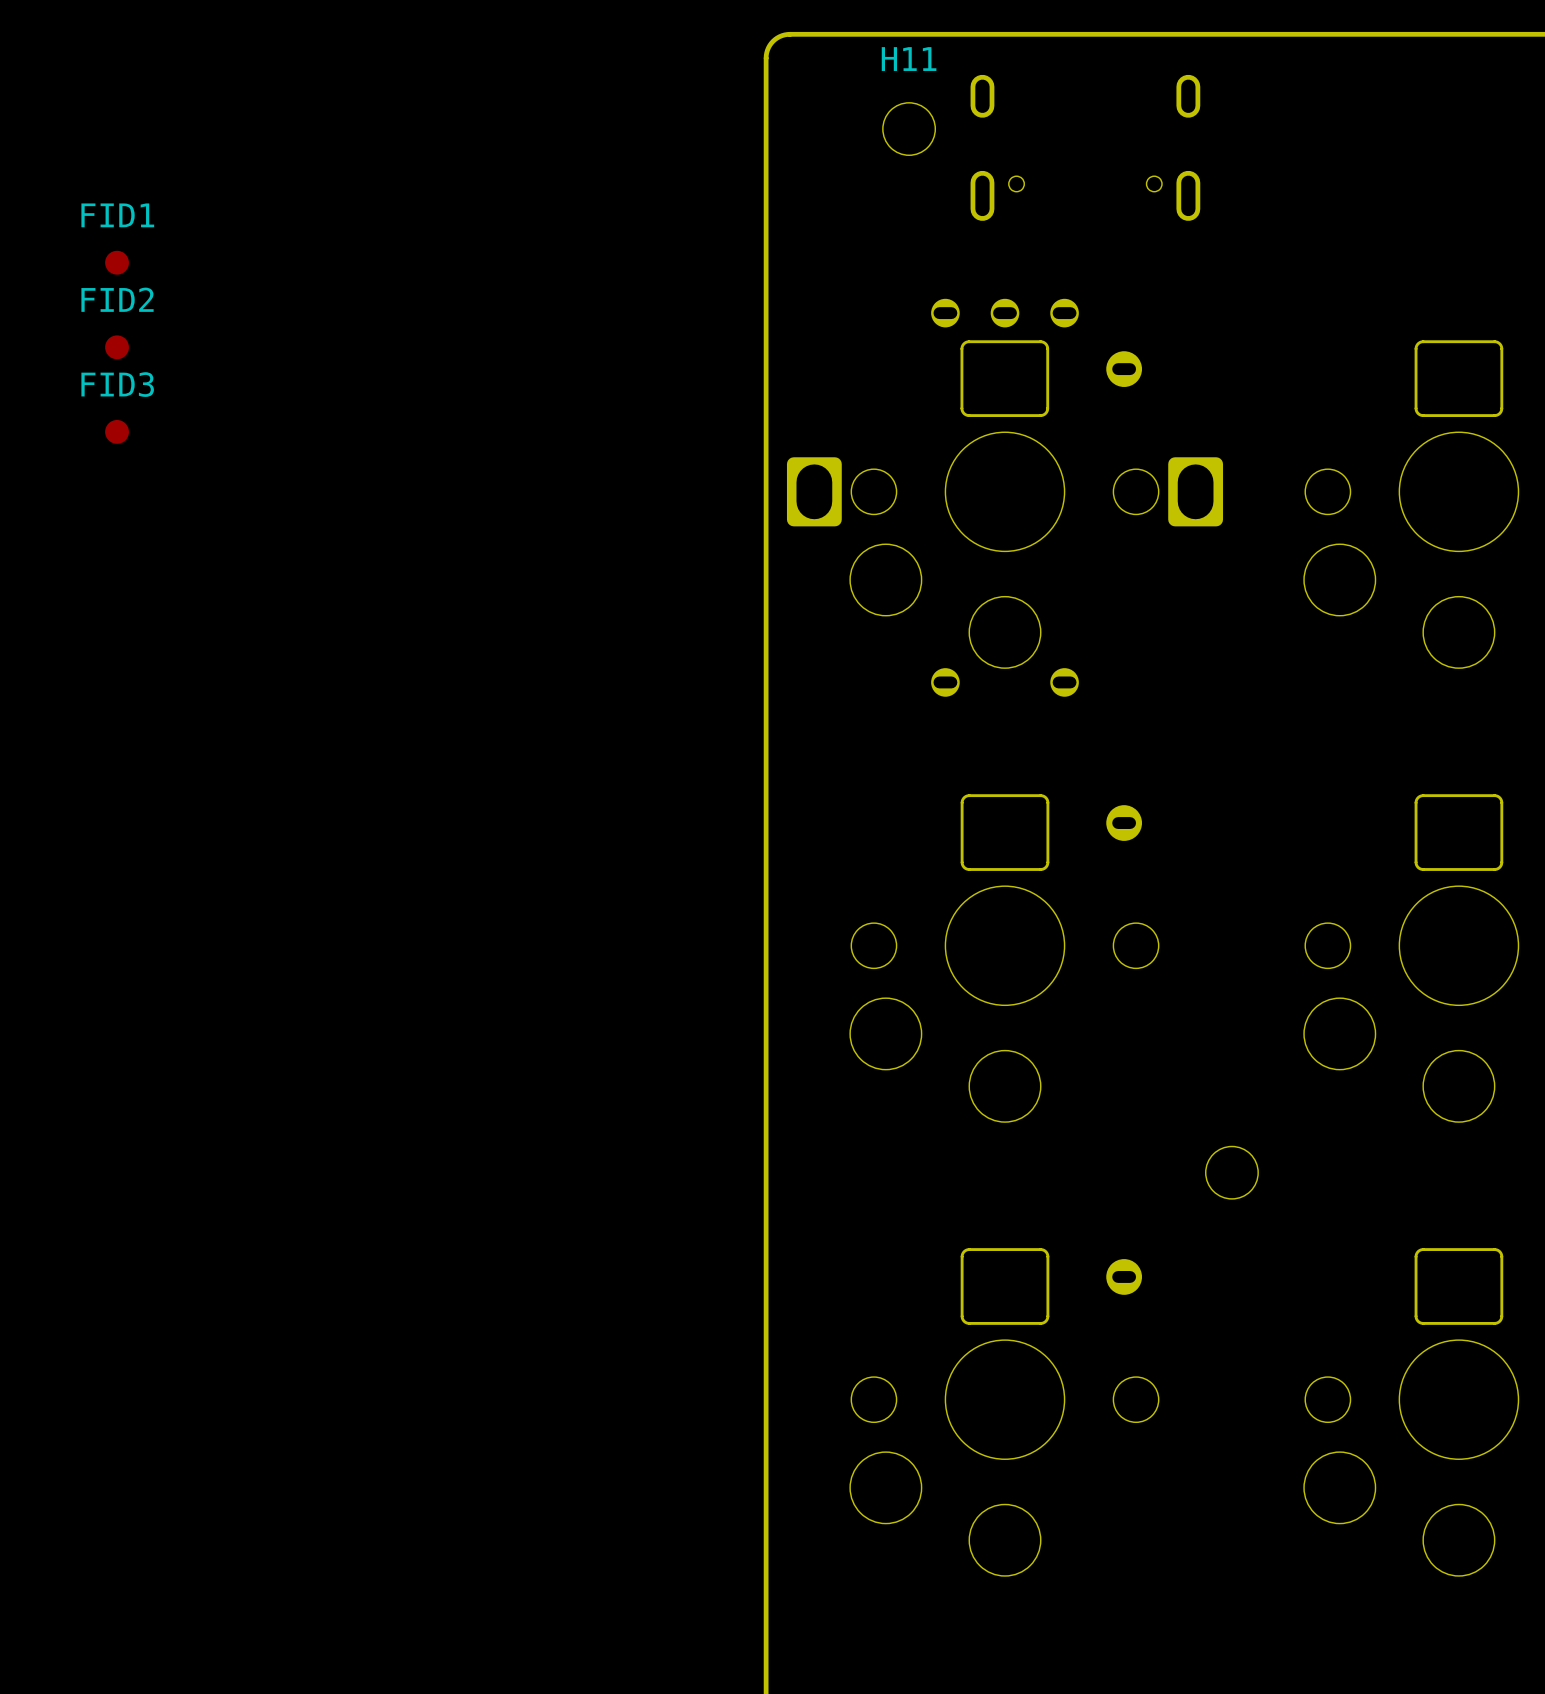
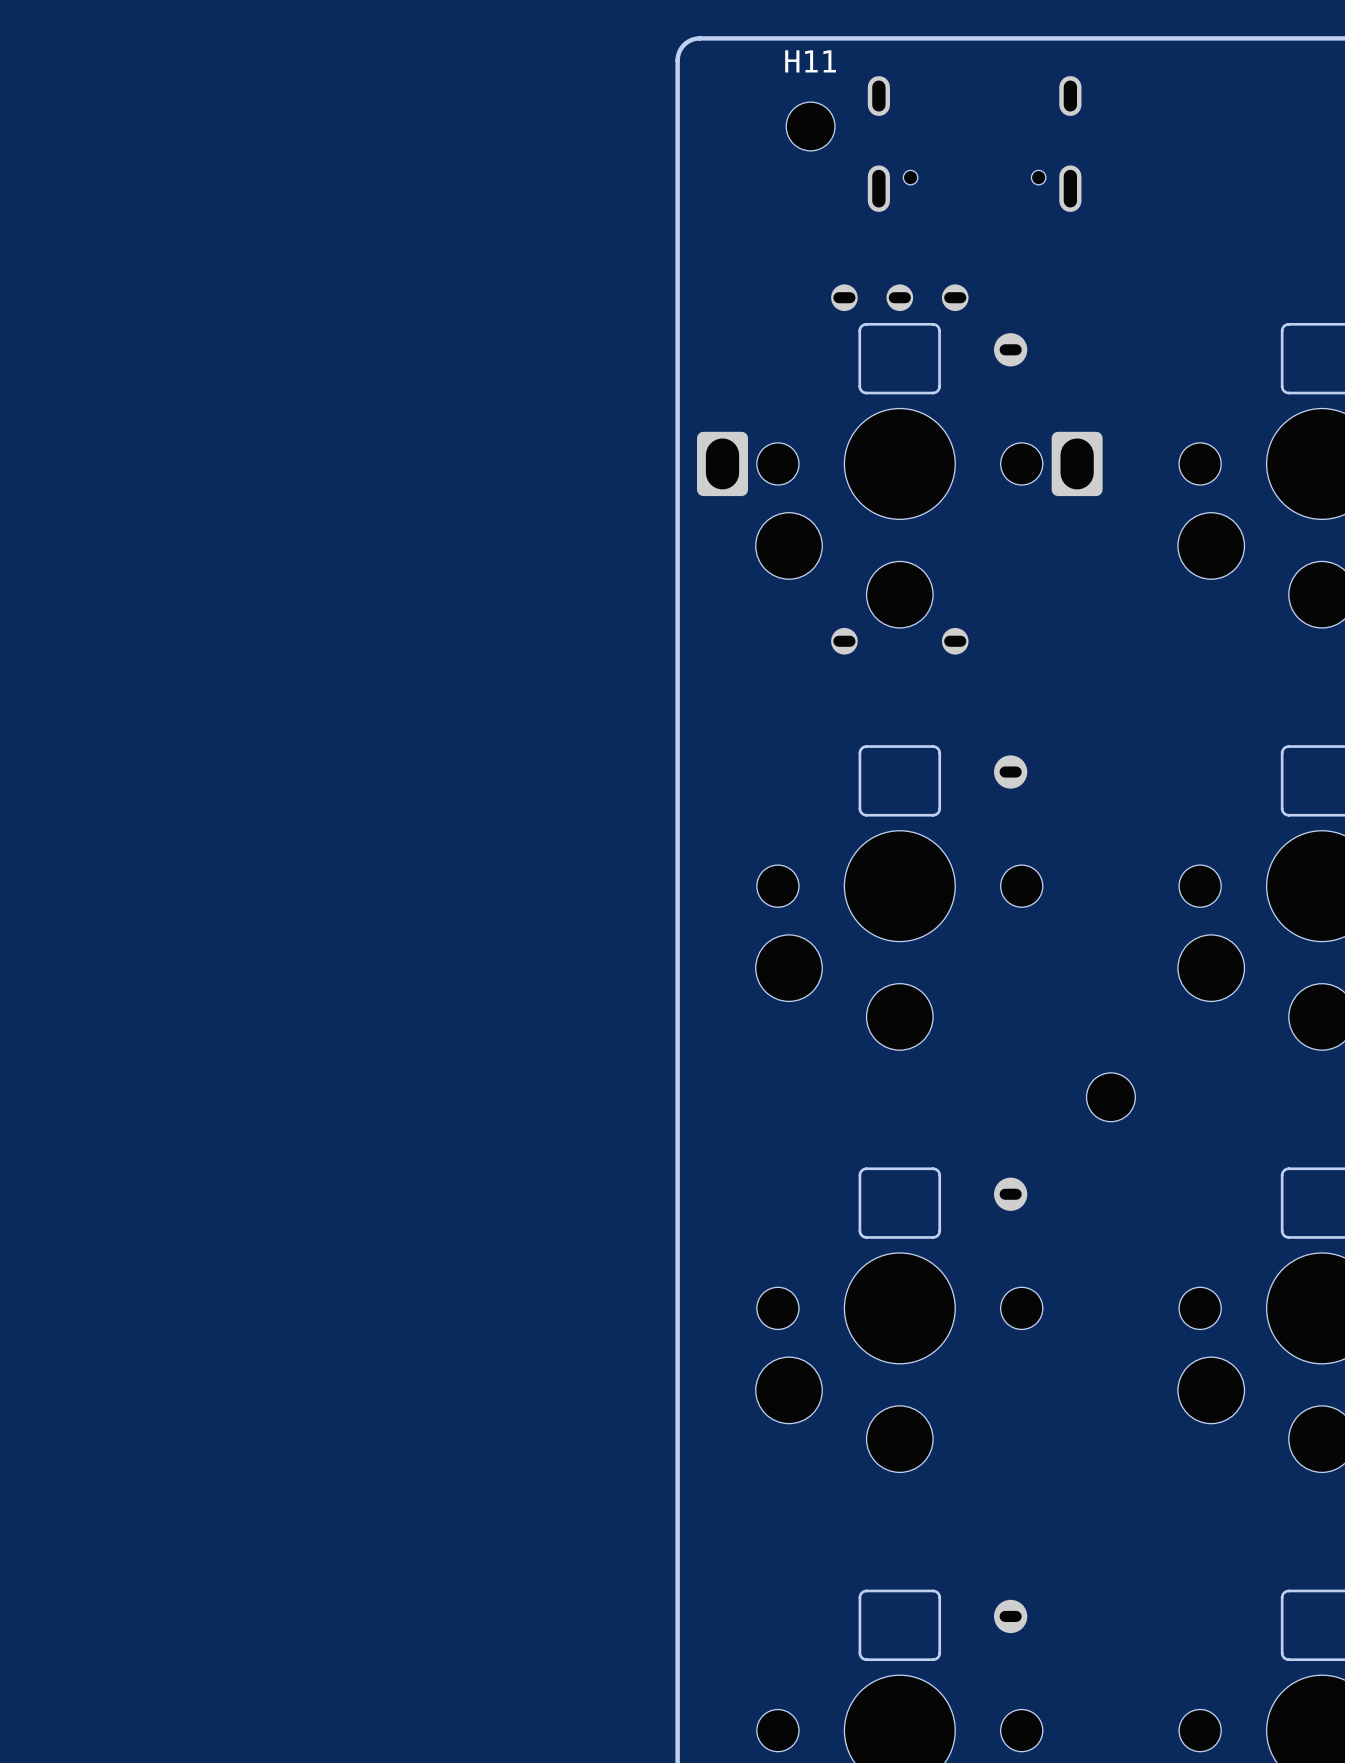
FID1: (117, 262) -> none
FID2: (117, 347) -> none
FID3: (117, 431) -> none

